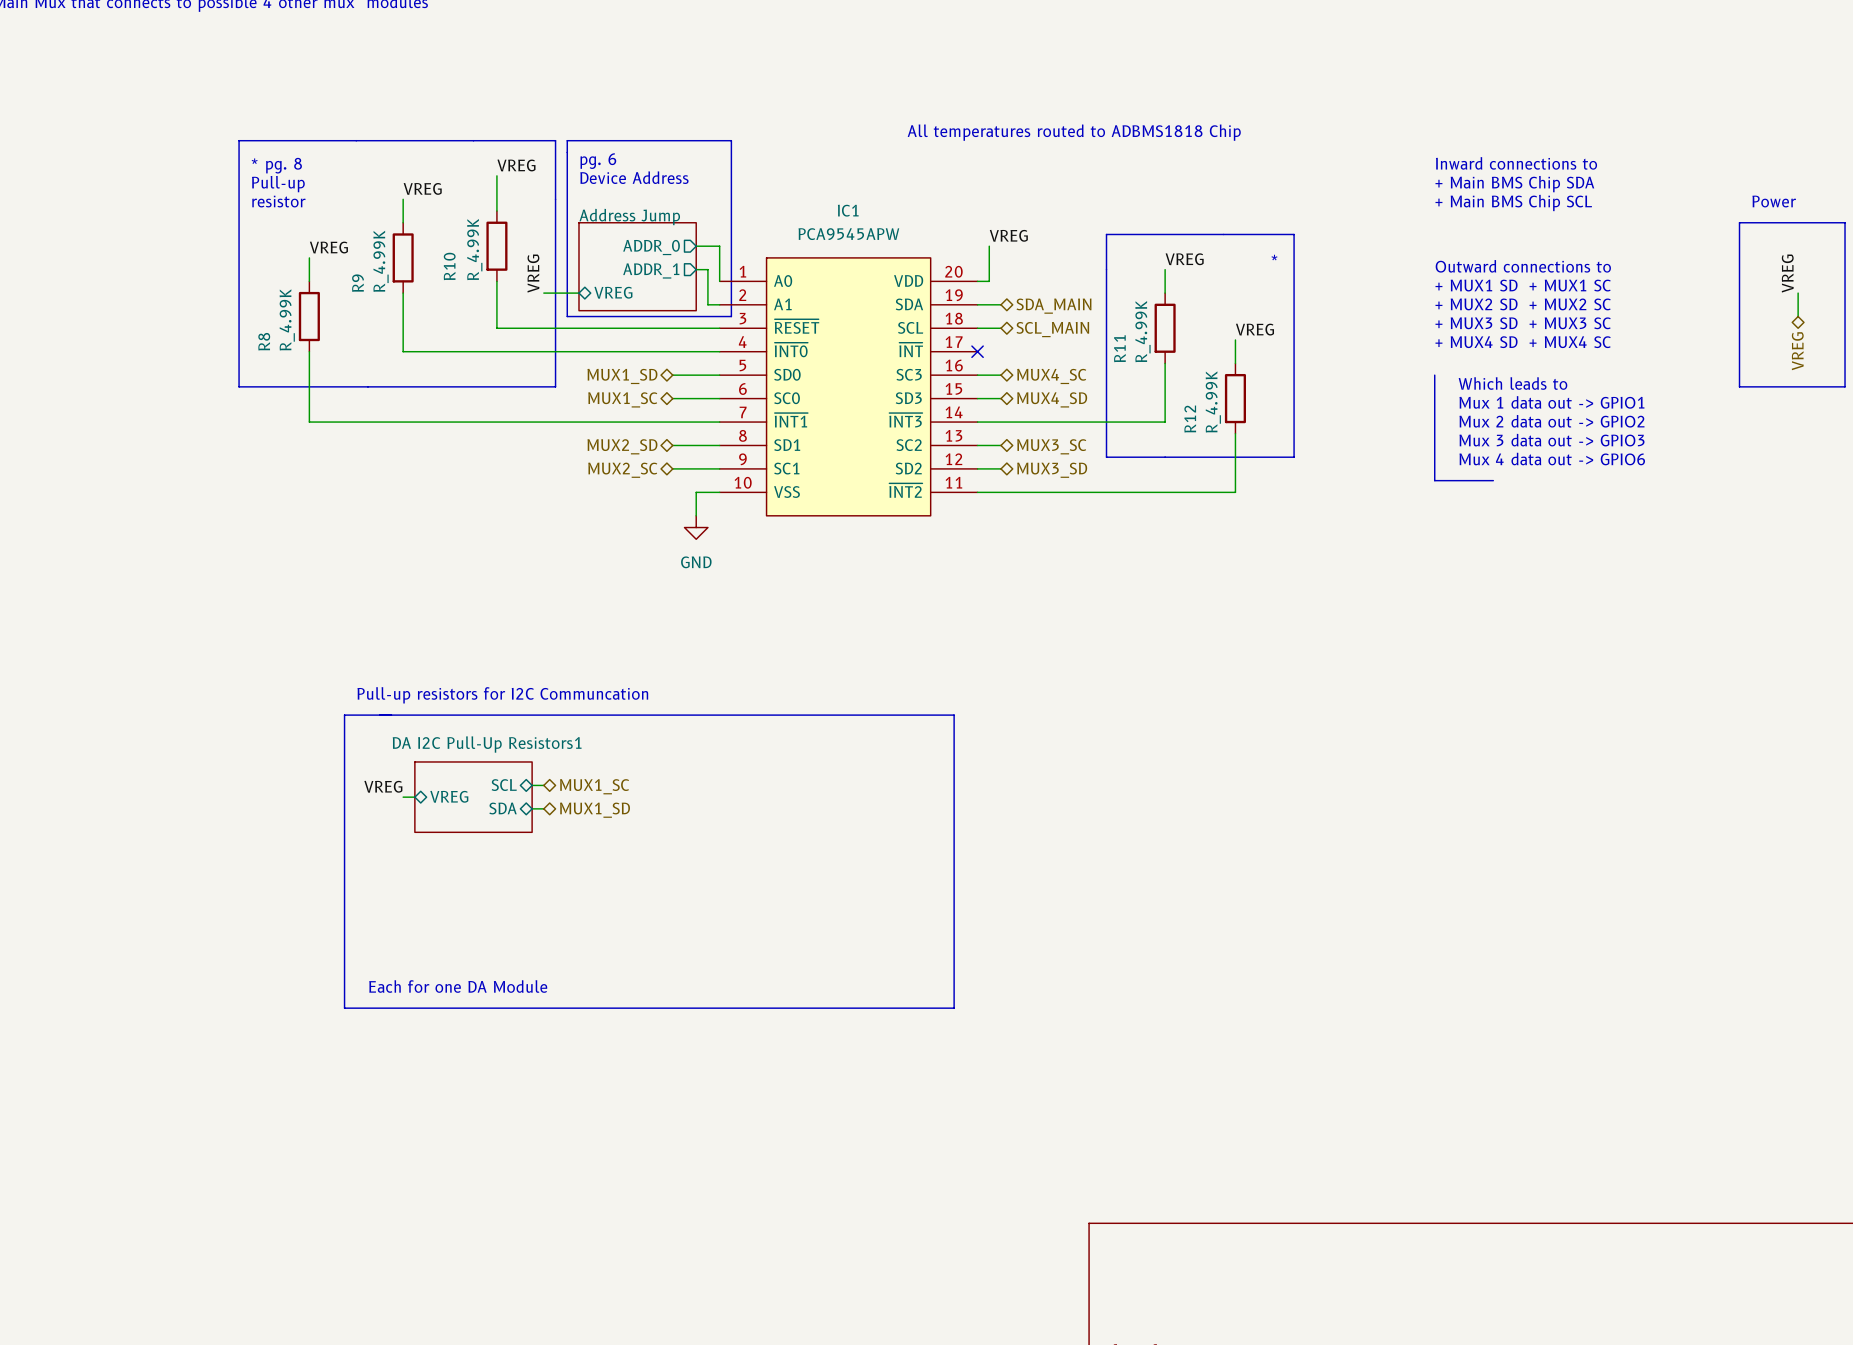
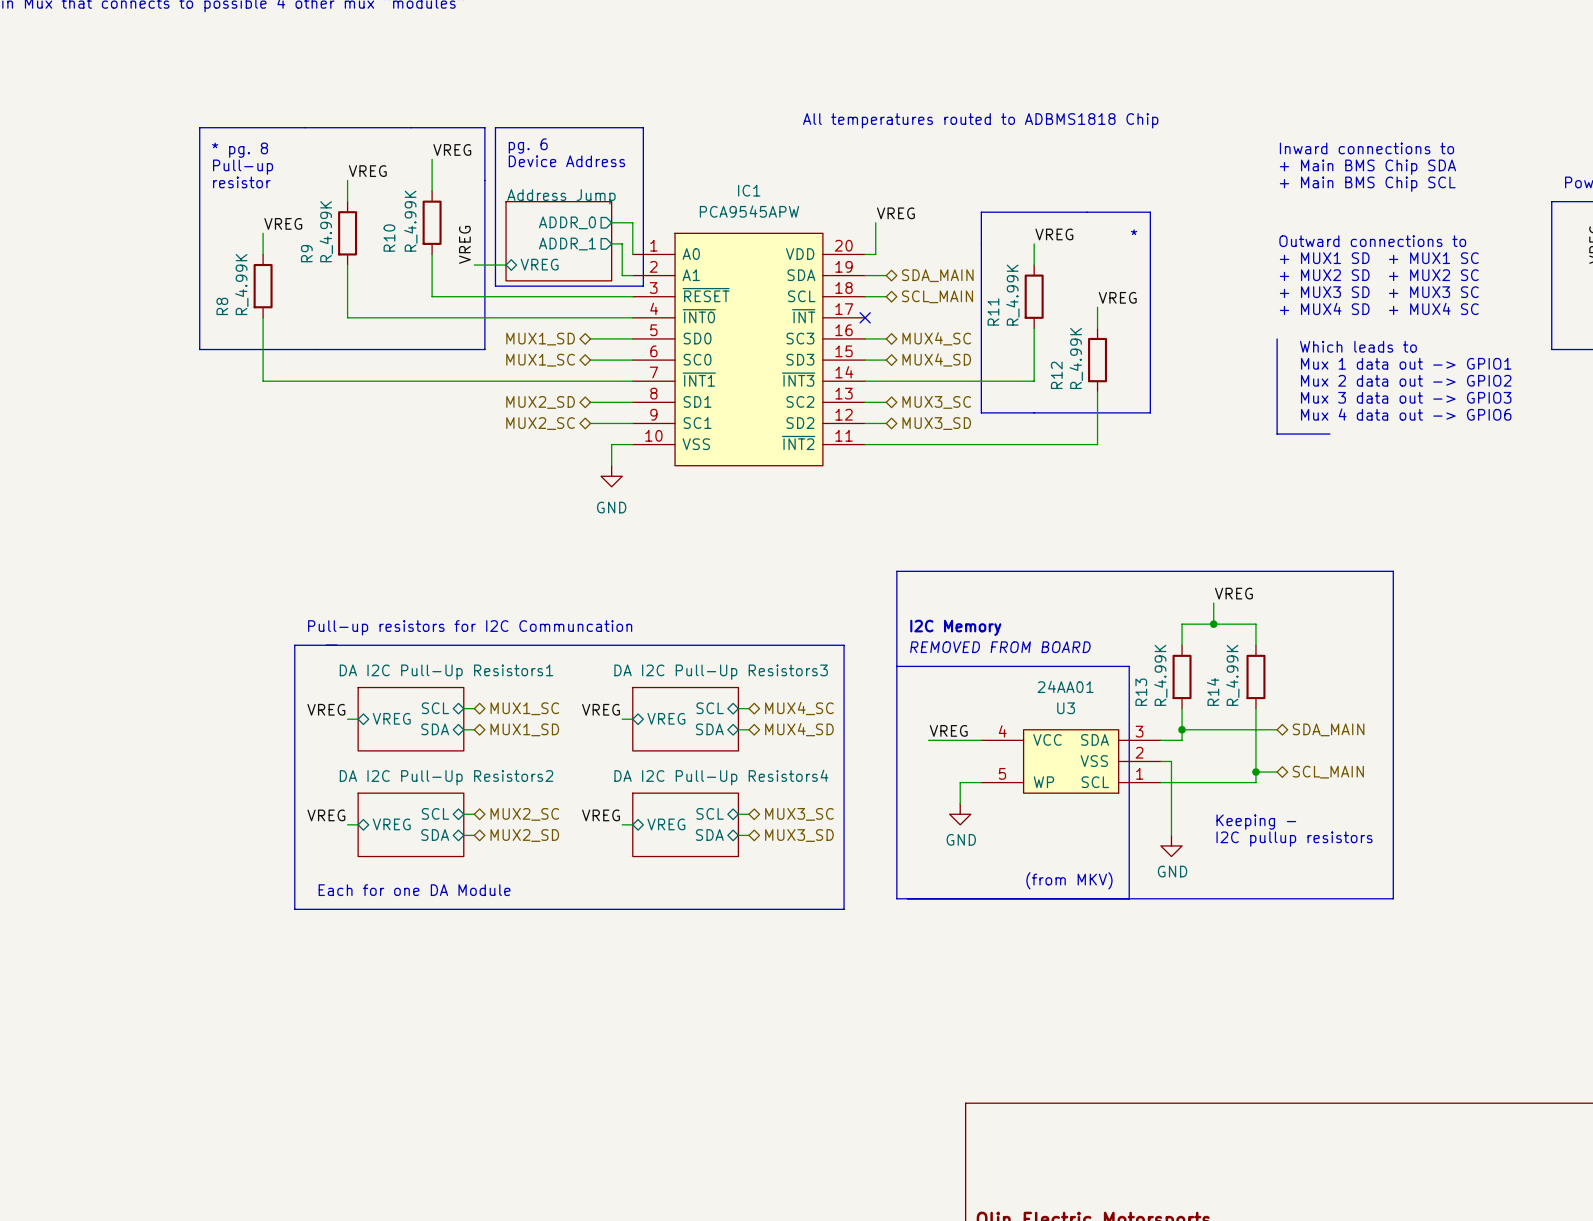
line: none -> (896, 571) (896, 898) (1393, 898) (1393, 571) (896, 571)
label: none -> VREG (1233, 593)
wire: none -> (1213, 603) (1213, 624)
junction: none -> (1213, 624)
text: none -> I2C Memory (955, 627)
wire: none -> (1182, 645) (1182, 624) (1255, 624) (1255, 645)
text: none -> REMOVED FROM BOARD (1000, 647)
line: none -> (896, 666) (1129, 666) (1129, 898)
R13: none -> R_4.99K (1182, 676)
R14: none -> R_4.99K (1255, 676)
sheet pin: none -> SCL (710, 708)
wire: none -> (738, 708) (748, 708)
wire: none -> (1182, 708) (1182, 740) (1160, 740)
wire: none -> (1255, 708) (1255, 782) (1160, 782)
label: none -> VREG (601, 709)
hierarchical label: none -> MUX4_SC (799, 708)
sheet pin: none -> VREG (666, 718)
wire: none -> (622, 719) (632, 719)
sheet DA I2C Pull-Up Resistors3: none -> (685, 719)
sheet pin: none -> SDA (709, 729)
wire: none -> (738, 729) (748, 729)
wire: none -> (1182, 729) (1277, 729)
junction: none -> (1182, 729)
hierarchical label: none -> MUX4_SD (799, 729)
label: none -> VREG (948, 730)
hierarchical label: none -> SDA_MAIN (1328, 729)
wire: none -> (928, 740) (981, 740)
U3: none -> 24AA01 (1071, 761)
wire: none -> (1160, 761) (1171, 761) (1171, 835)
wire: none -> (1255, 772) (1277, 772)
junction: none -> (1255, 772)
hierarchical label: none -> SCL_MAIN (1328, 772)
wire: none -> (981, 782) (960, 782) (960, 803)
sheet pin: none -> SCL (435, 813)
wire: none -> (463, 814) (474, 814)
sheet pin: none -> SCL (710, 813)
wire: none -> (738, 814) (748, 814)
power symbol: none -> GND (960, 814)
label: none -> VREG (326, 815)
hierarchical label: none -> MUX2_SC (524, 814)
label: none -> VREG (601, 815)
hierarchical label: none -> MUX3_SC (799, 814)
text: none -> Keeping - (1256, 822)
wire: none -> (347, 824) (358, 824)
sheet pin: none -> VREG (391, 824)
sheet DA I2C Pull-Up Resistors2: none -> (410, 824)
wire: none -> (622, 824) (632, 824)
sheet pin: none -> VREG (666, 824)
sheet DA I2C Pull-Up Resistors4: none -> (685, 824)
sheet pin: none -> SDA (435, 835)
sheet pin: none -> SDA (709, 835)
wire: none -> (463, 835) (474, 835)
wire: none -> (738, 835) (748, 835)
hierarchical label: none -> MUX2_SD (524, 835)
hierarchical label: none -> MUX3_SD (799, 835)
text: none -> I2C pullup resistors (1294, 839)
power symbol: none -> GND (1171, 845)
text: none -> (from MKV) (1069, 880)

